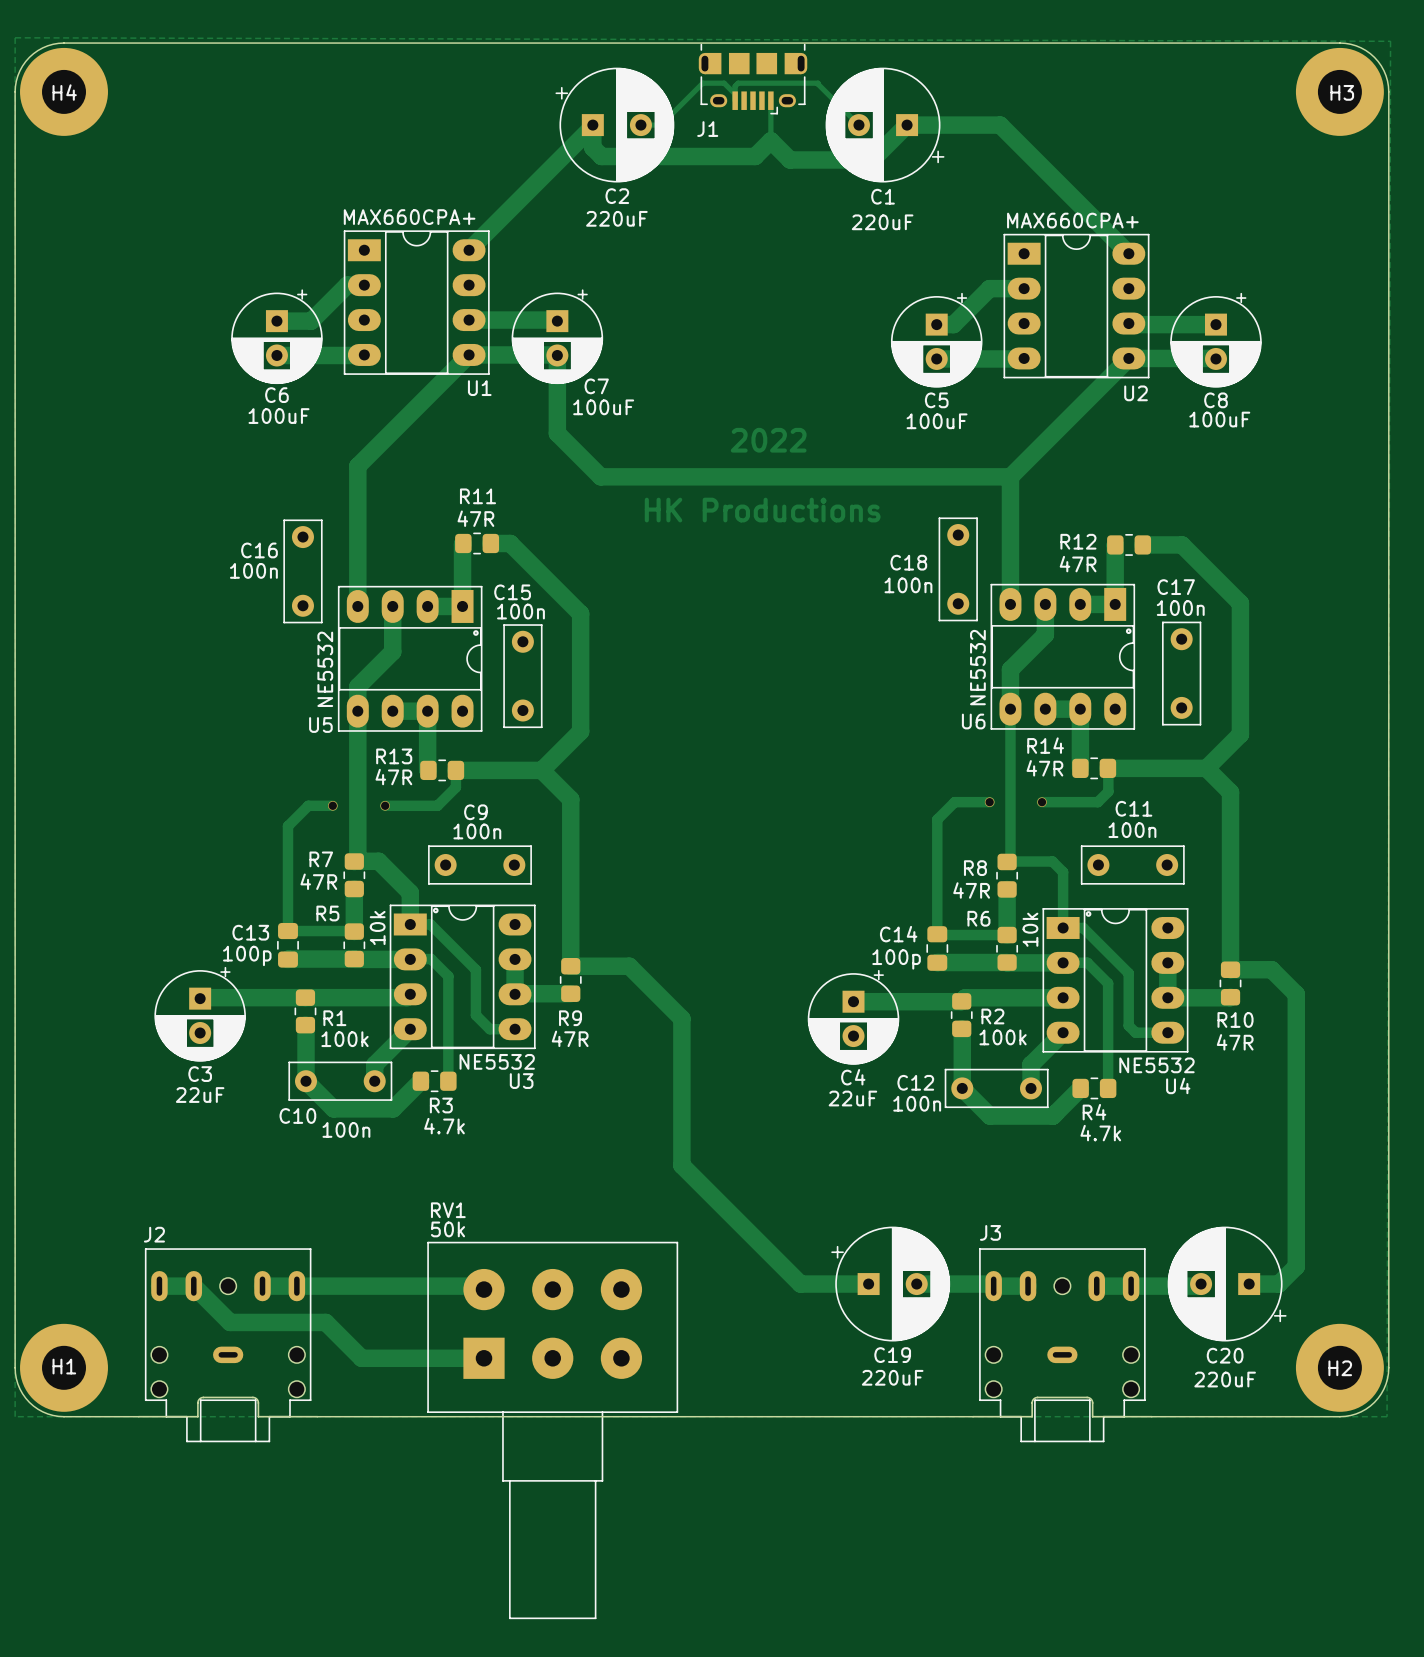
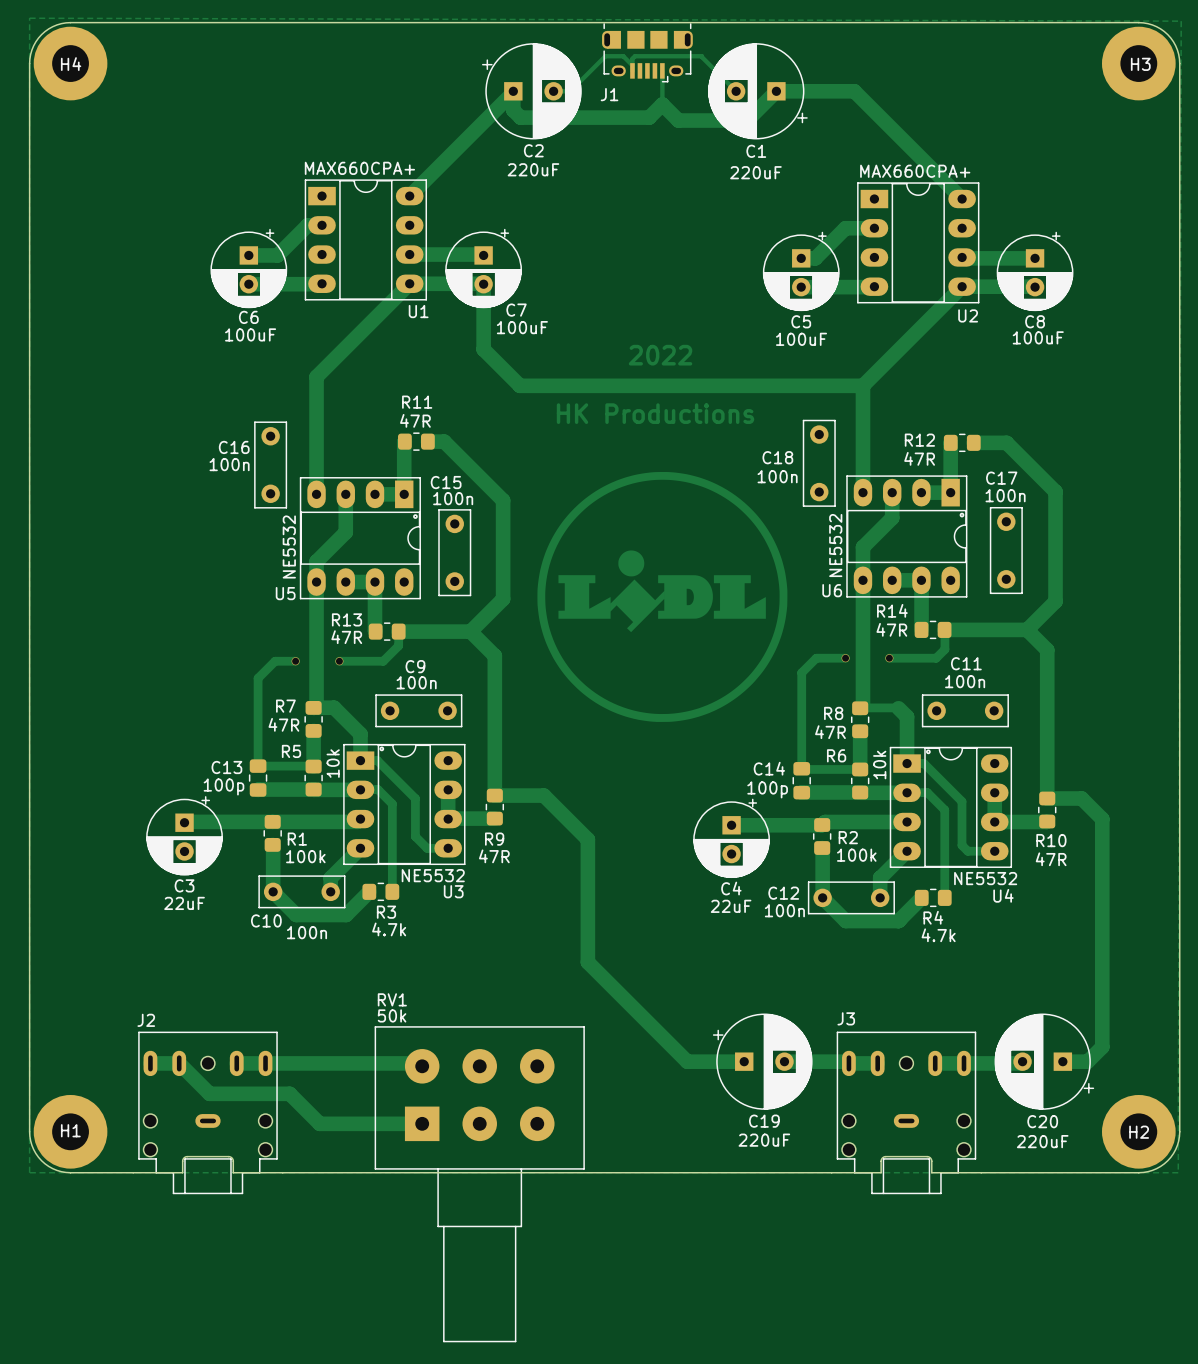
drawing: none -> [537, 471, 788, 722]
track width: thin (1010, 709) (1010, 858) (1007, 861) -> thick (862, 580) (862, 705) (860, 708)
track width: thin (1052, 861) (1063, 872) (1063, 927) -> thick (898, 708) (907, 716) (907, 763)

